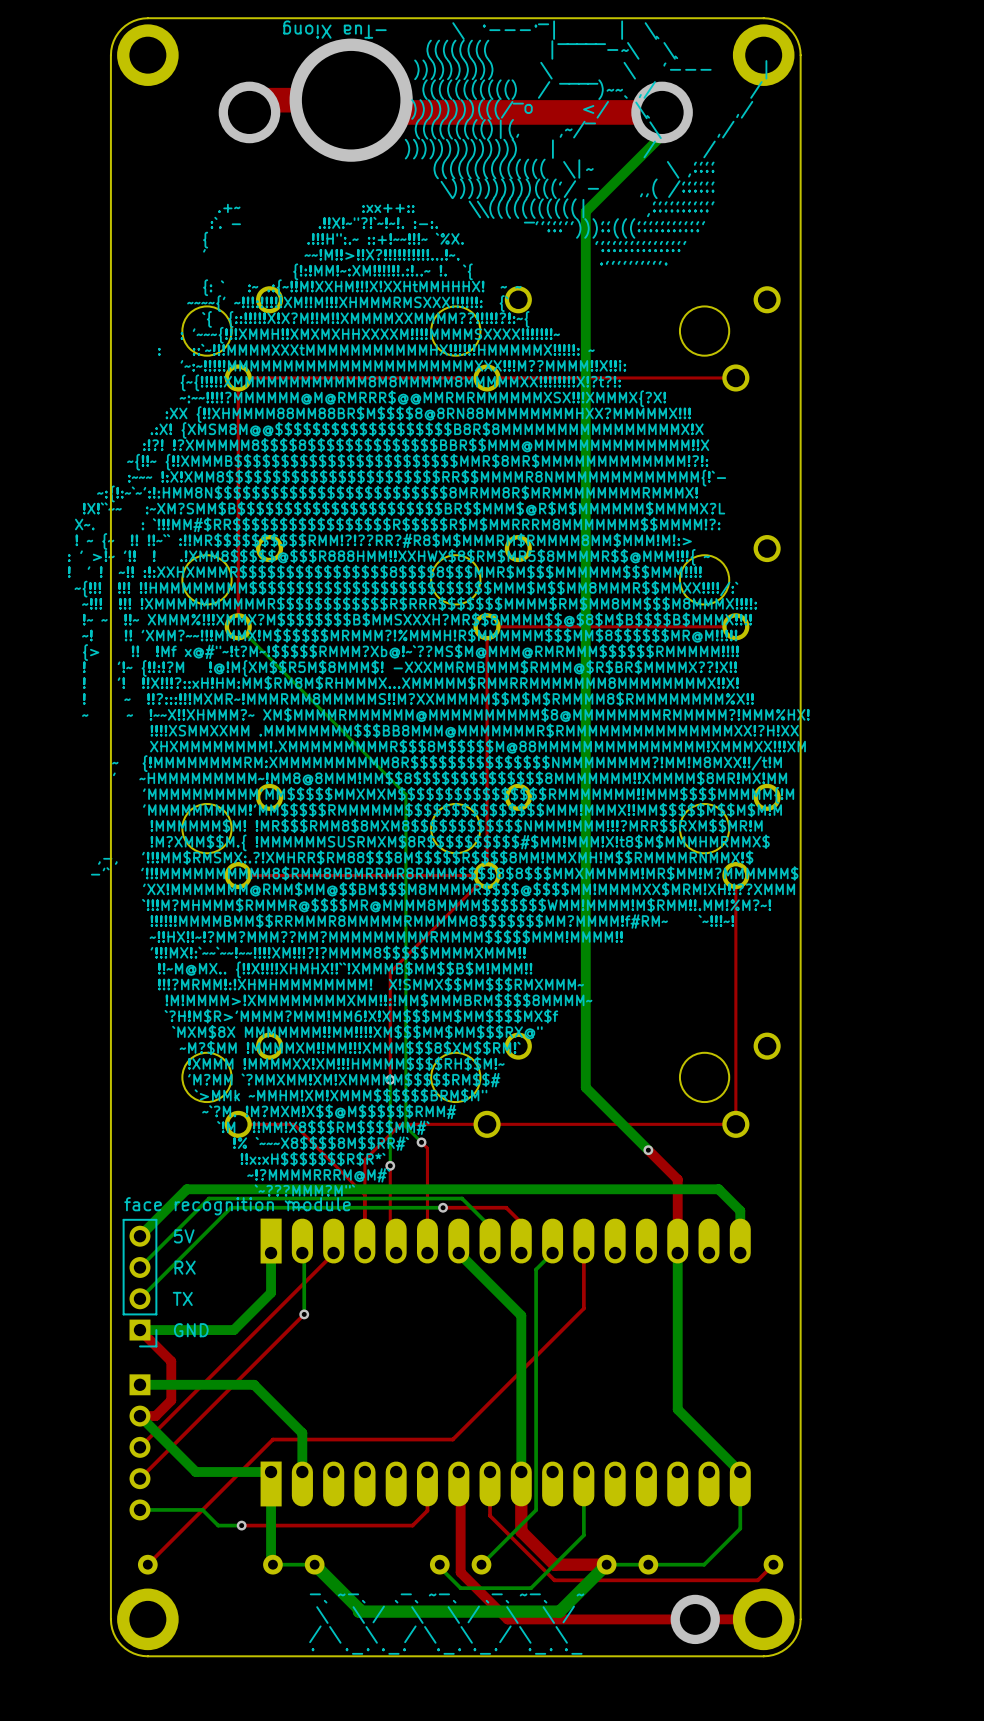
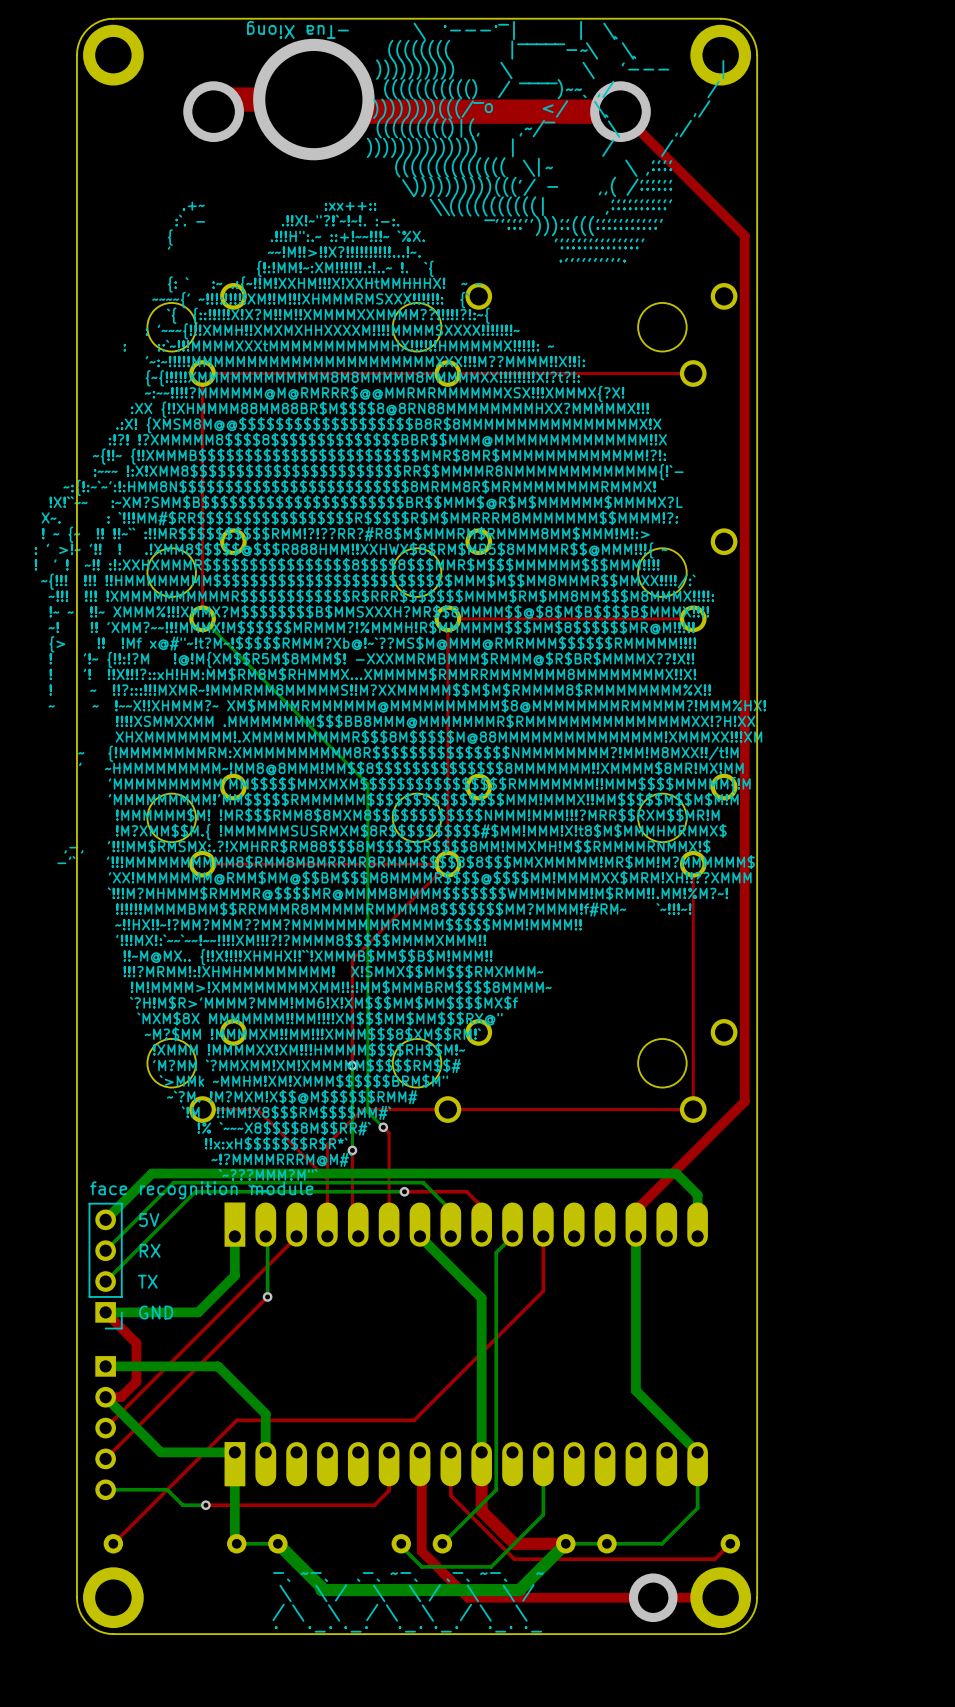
bottom track: (662, 112) (662, 135) (585, 211) (585, 1087) (648, 1150) -> none
top track: (648, 1150) (677, 1179) (677, 1226) -> (620, 111) (744, 235) (744, 1101) (635, 1210)
via: (648, 1150) -> none

